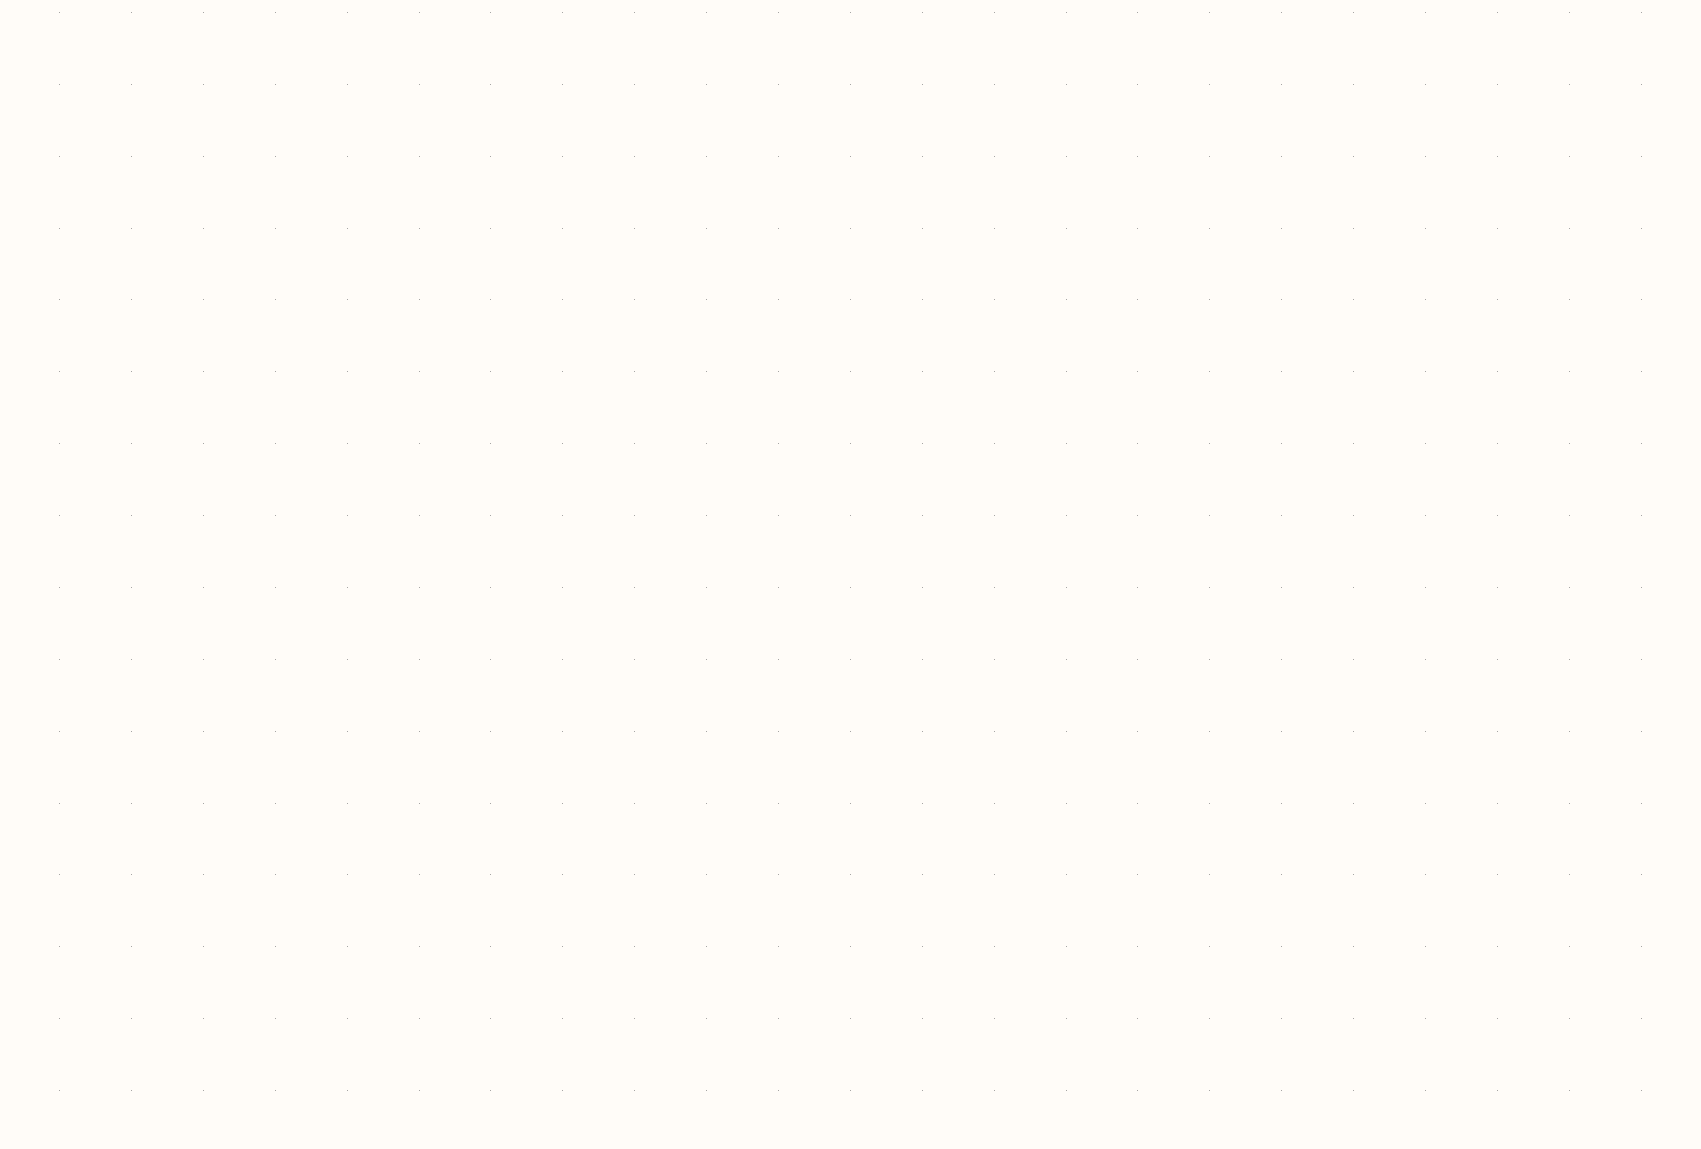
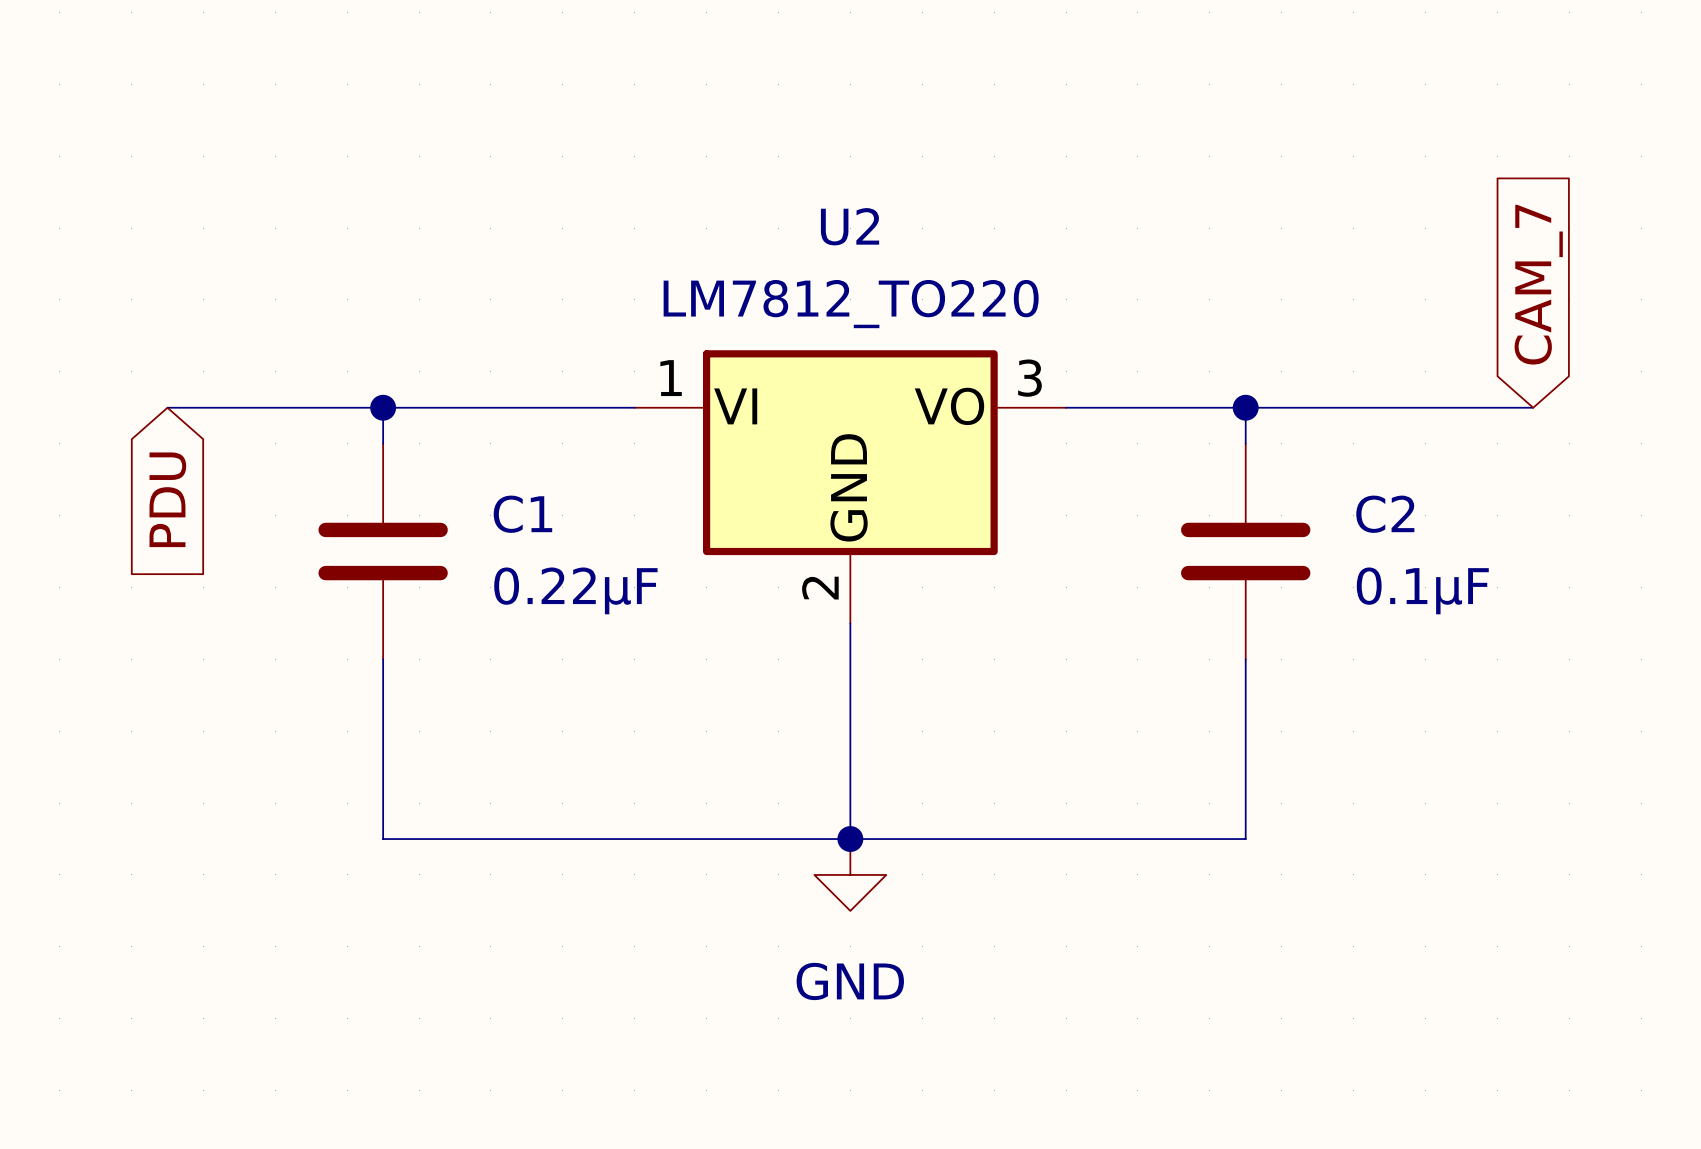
global label: none -> CAM_7 (1538, 284)
wire: none -> (167, 407) (634, 407)
wire: none -> (383, 407) (383, 443)
junction: none -> (383, 407)
wire: none -> (1066, 407) (1533, 407)
wire: none -> (1245, 407) (1245, 443)
junction: none -> (1245, 407)
U2: none -> LM7812_TO220 (850, 486)
global label: none -> PDU (167, 499)
C1: none -> 0.22µF (383, 551)
C2: none -> 0.1µF (1245, 551)
wire: none -> (850, 623) (850, 839)
wire: none -> (383, 659) (383, 839) (1245, 839) (1245, 659)
junction: none -> (850, 839)
power symbol: none -> GND (850, 874)

